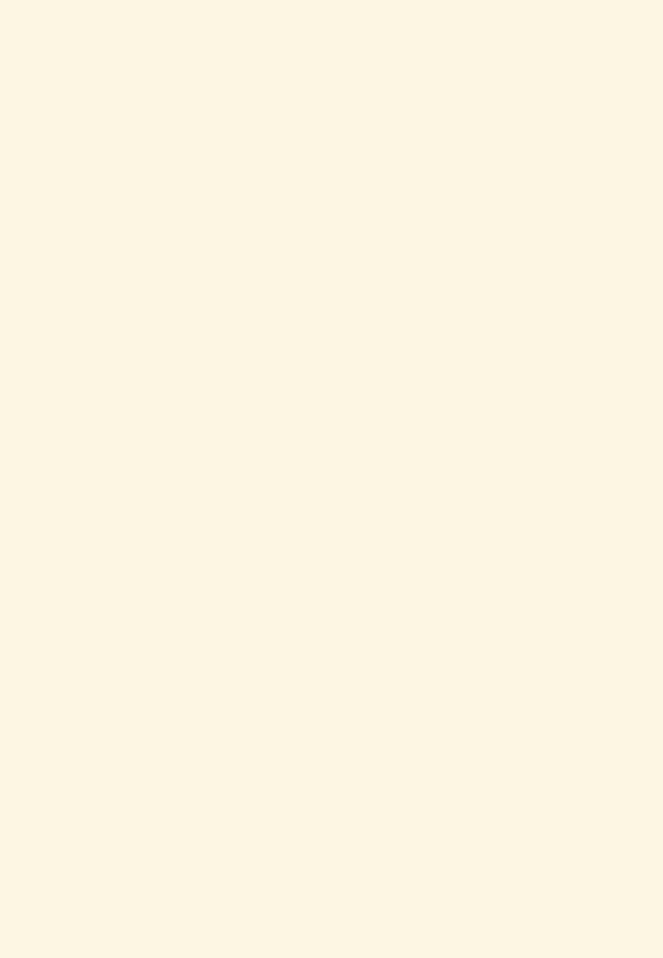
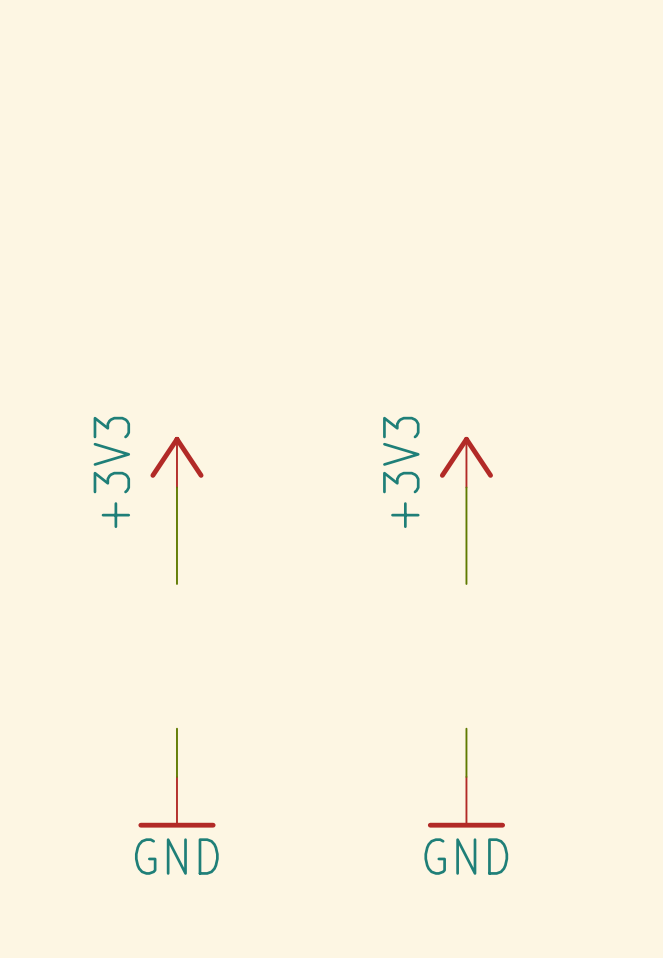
power symbol: none -> +3V3 (176, 462)
power symbol: none -> +3V3 (466, 462)
wire: none -> (176, 487) (176, 583)
wire: none -> (466, 487) (466, 583)
wire: none -> (176, 728) (176, 776)
wire: none -> (466, 728) (466, 776)
power symbol: none -> GND (176, 802)
power symbol: none -> GND (466, 802)

